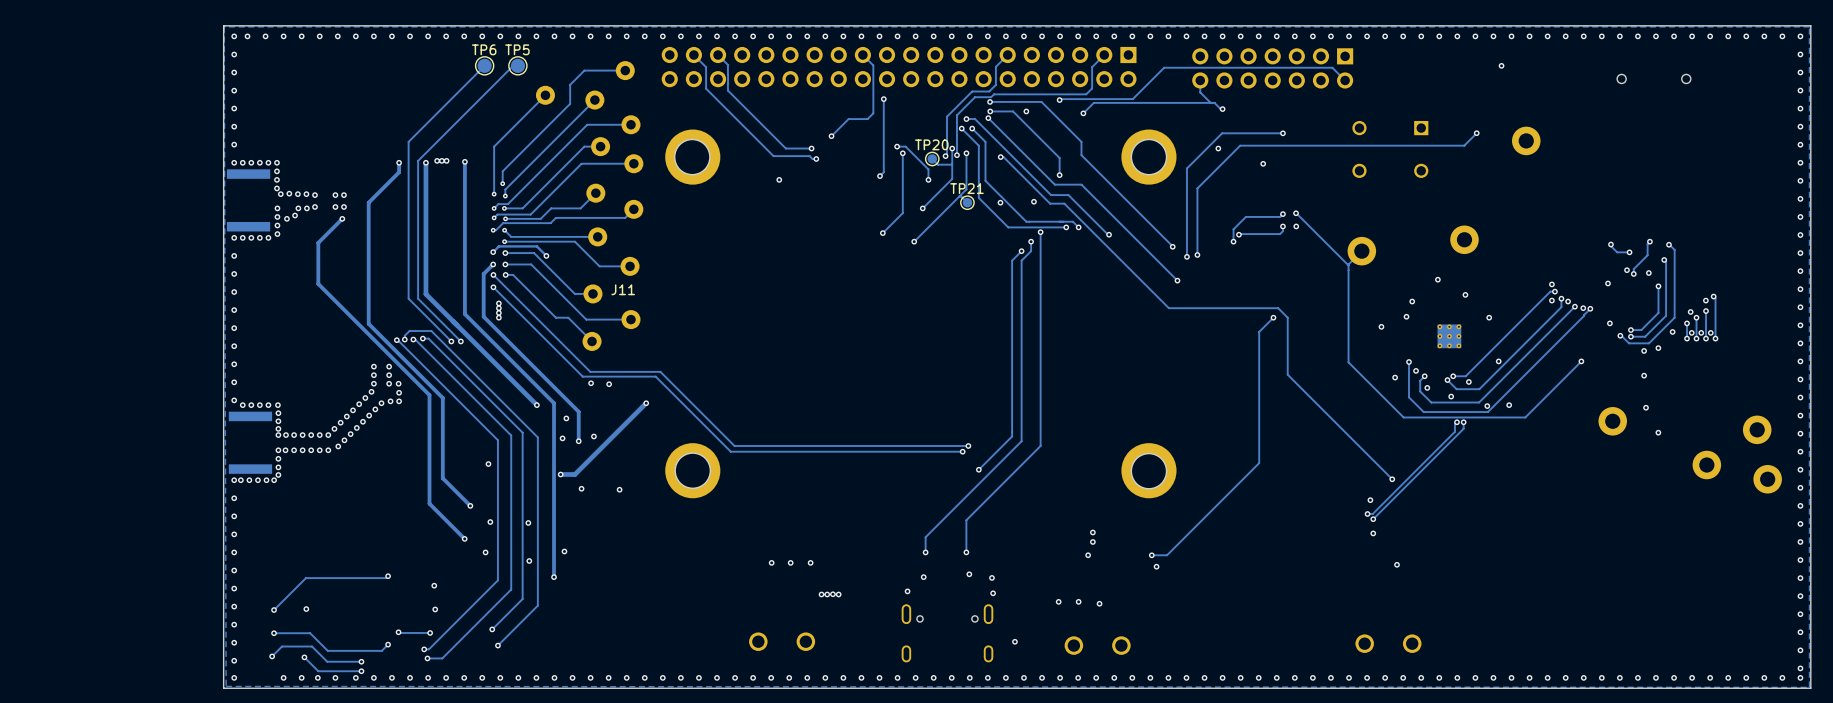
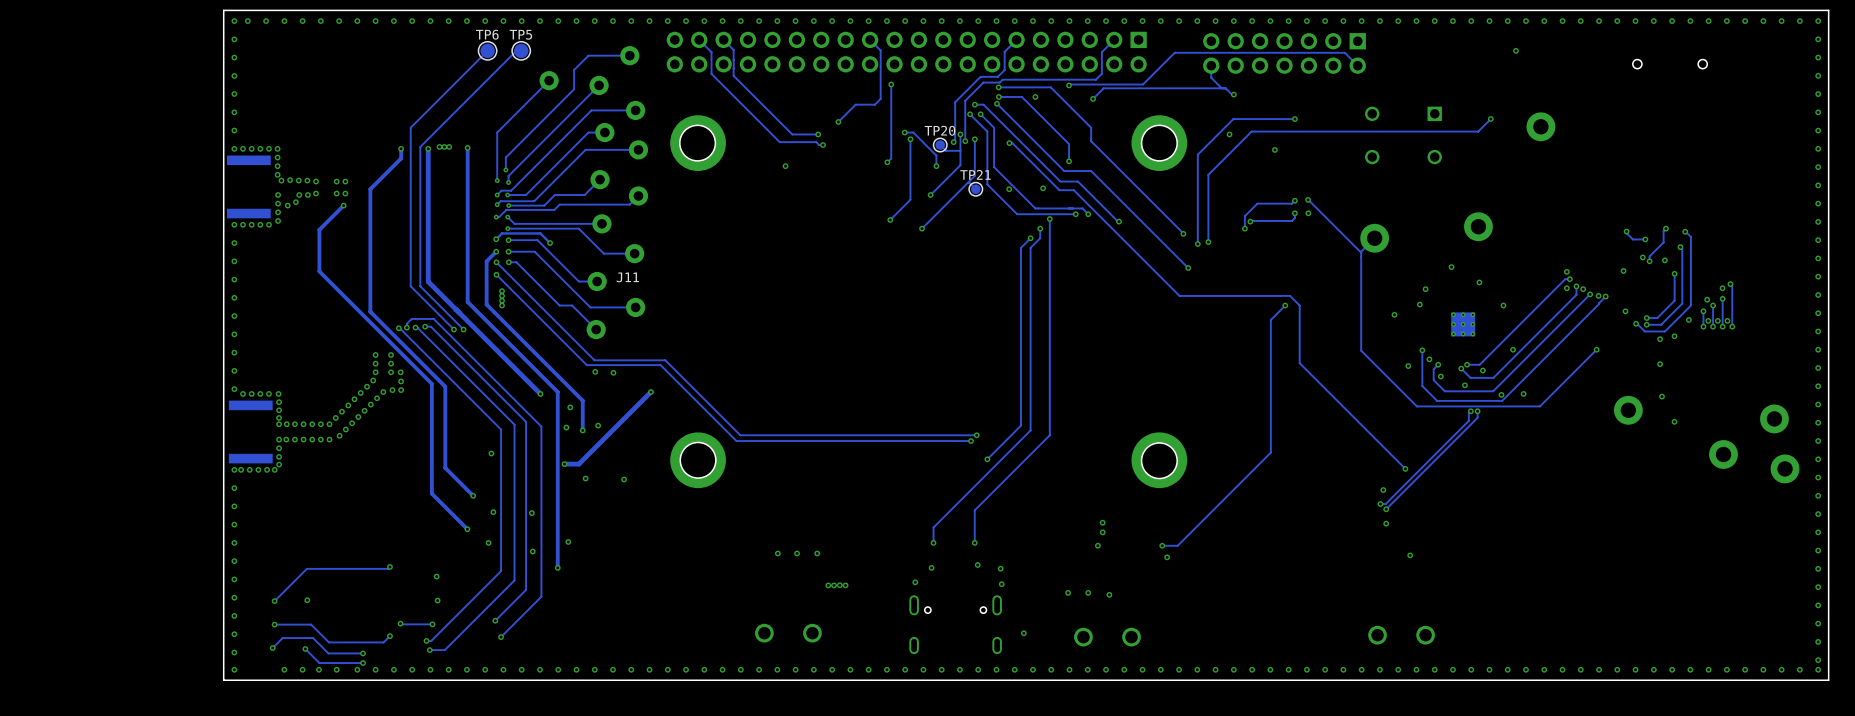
zone outline: (1809, 26) (224, 26) (226, 686) (1809, 687) (1809, 26) -> none

